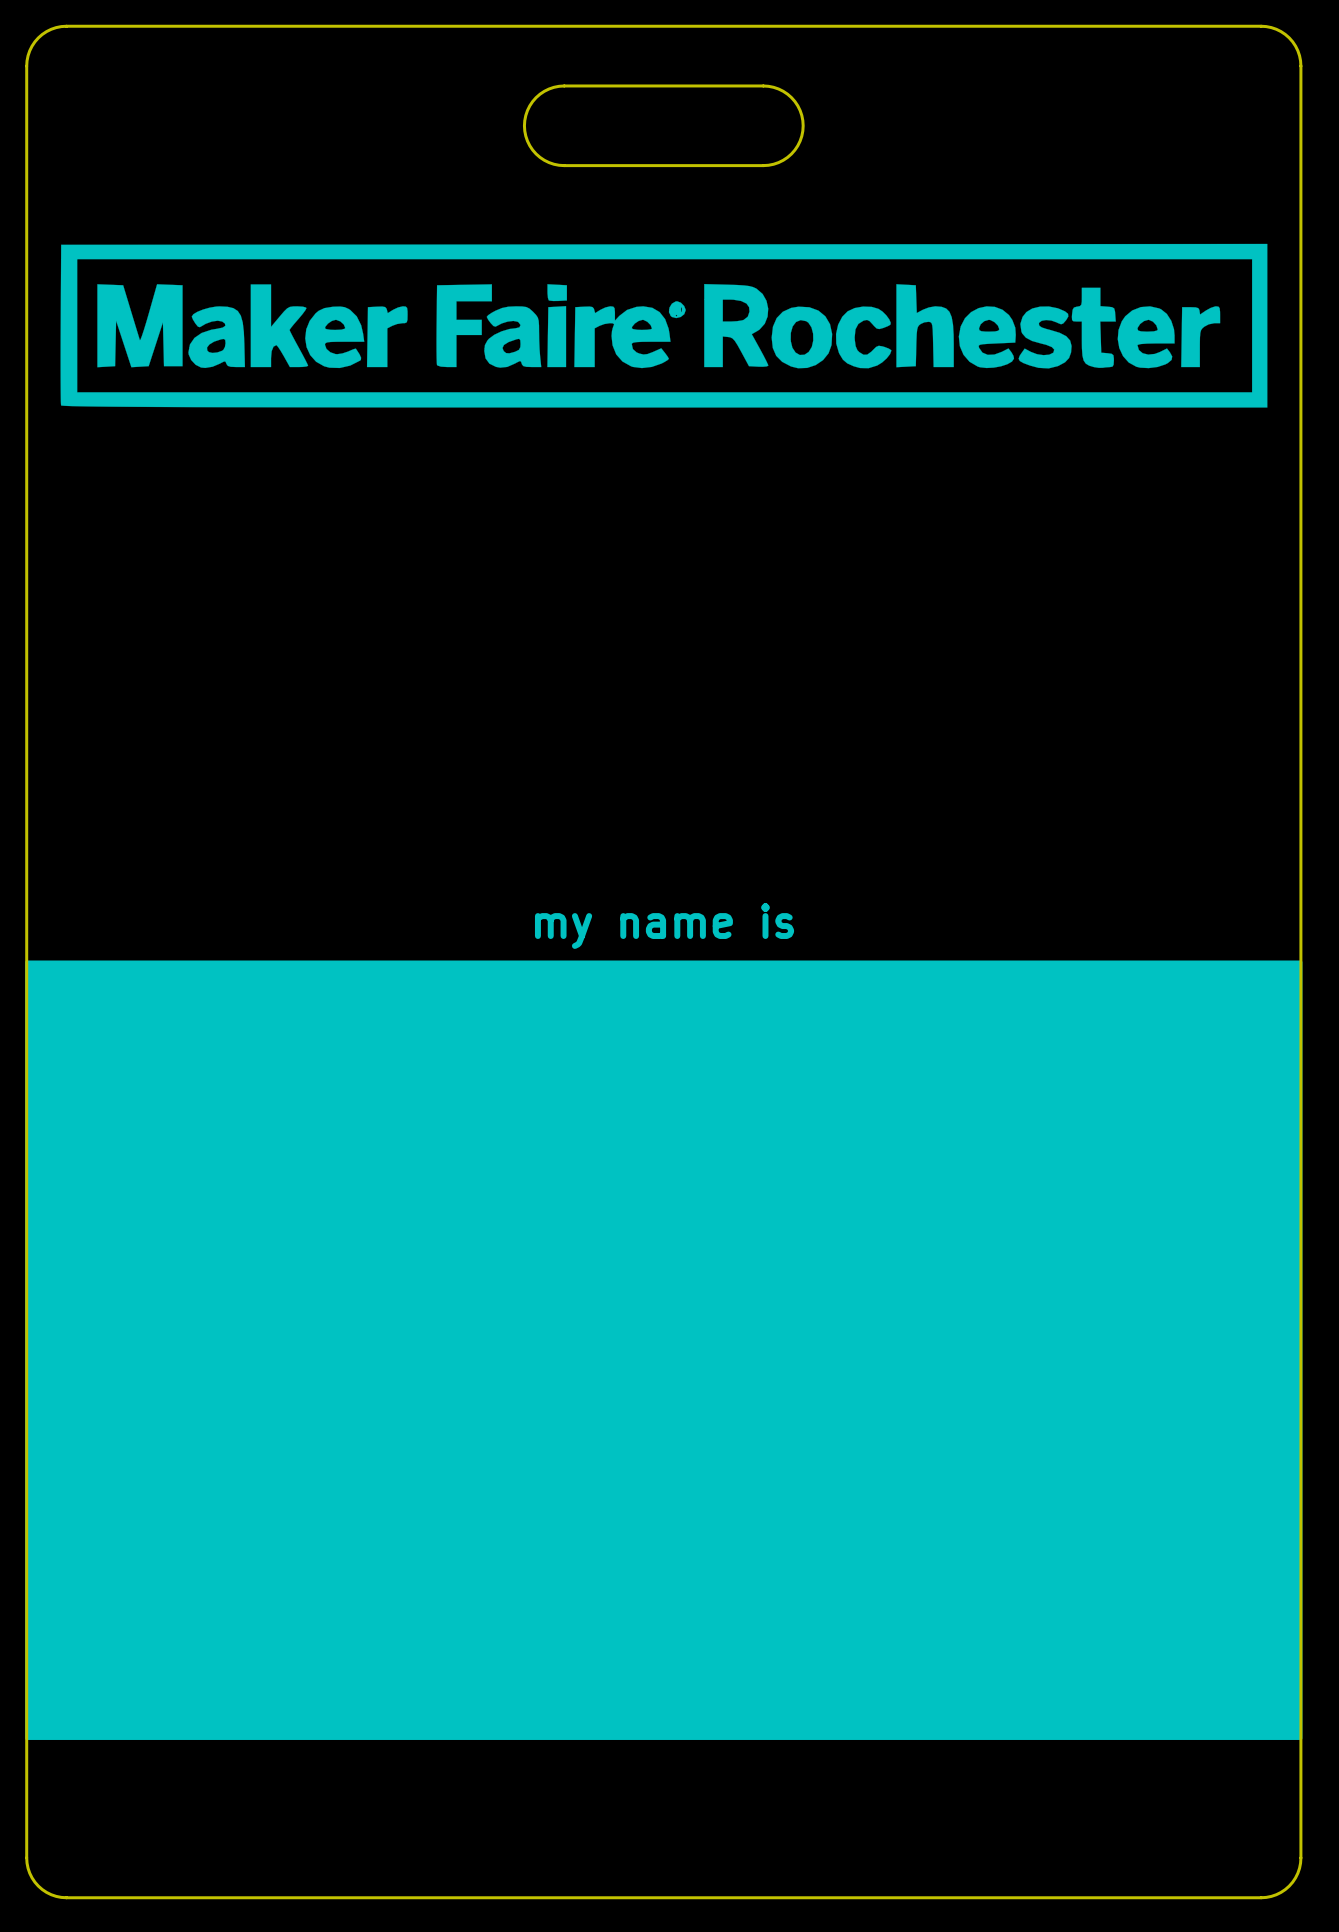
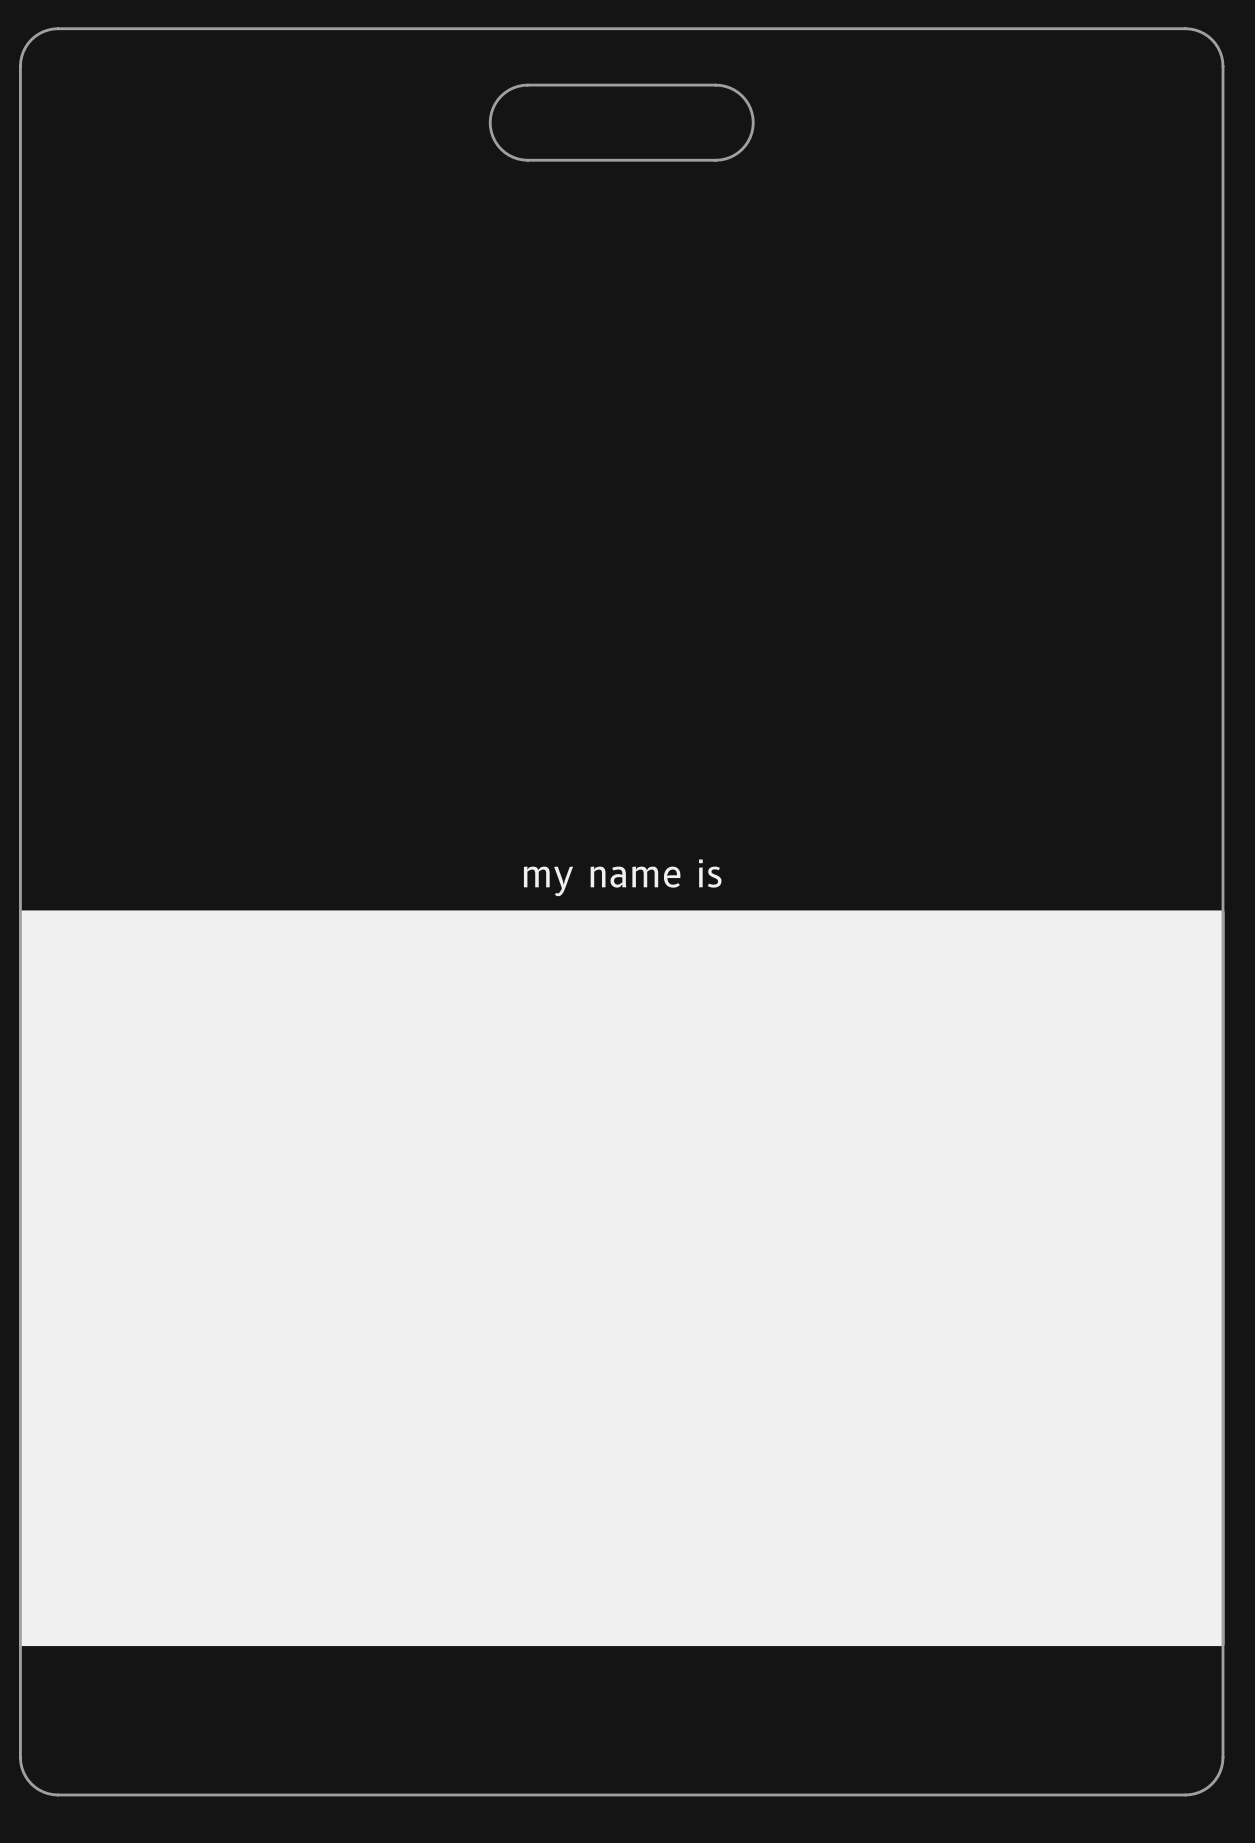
drawing: [60, 243, 1268, 408] -> none

